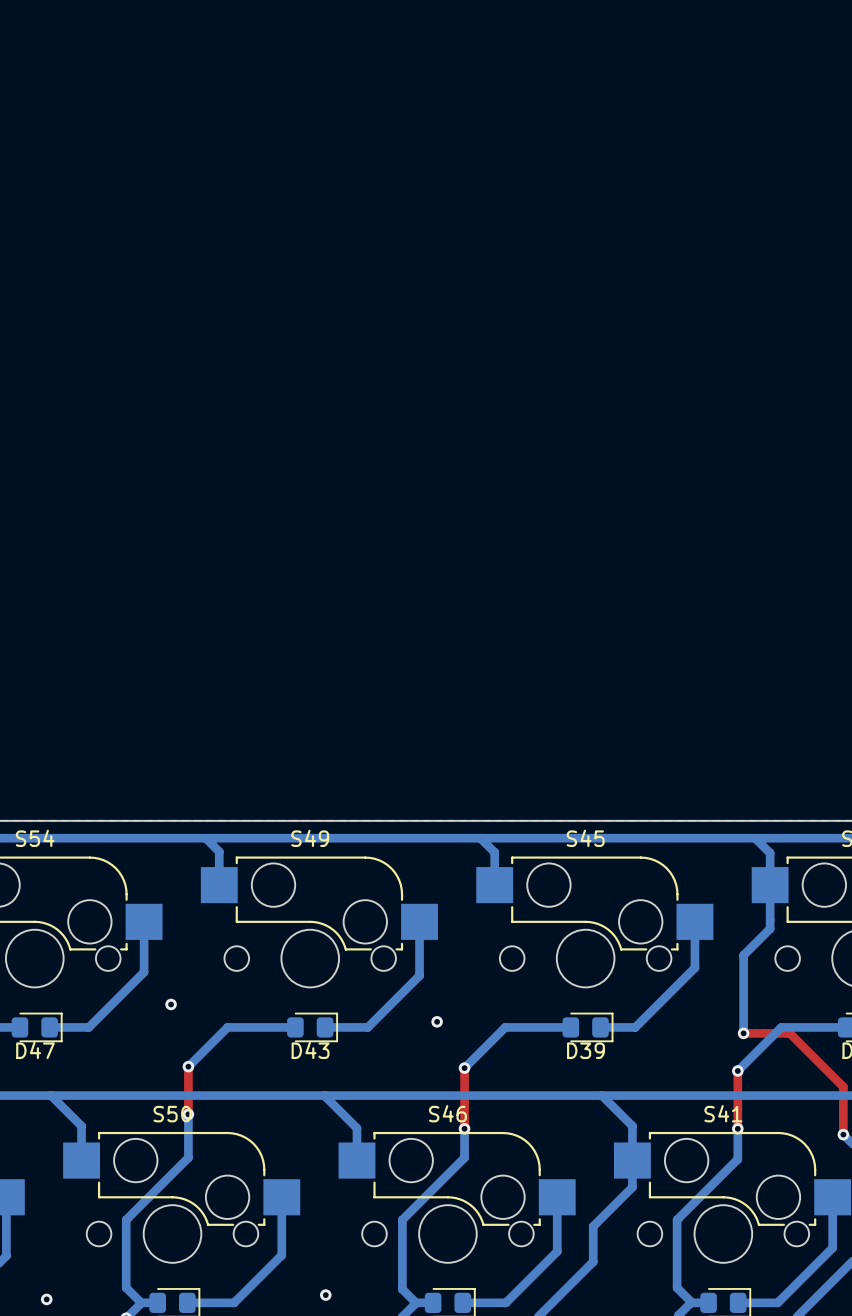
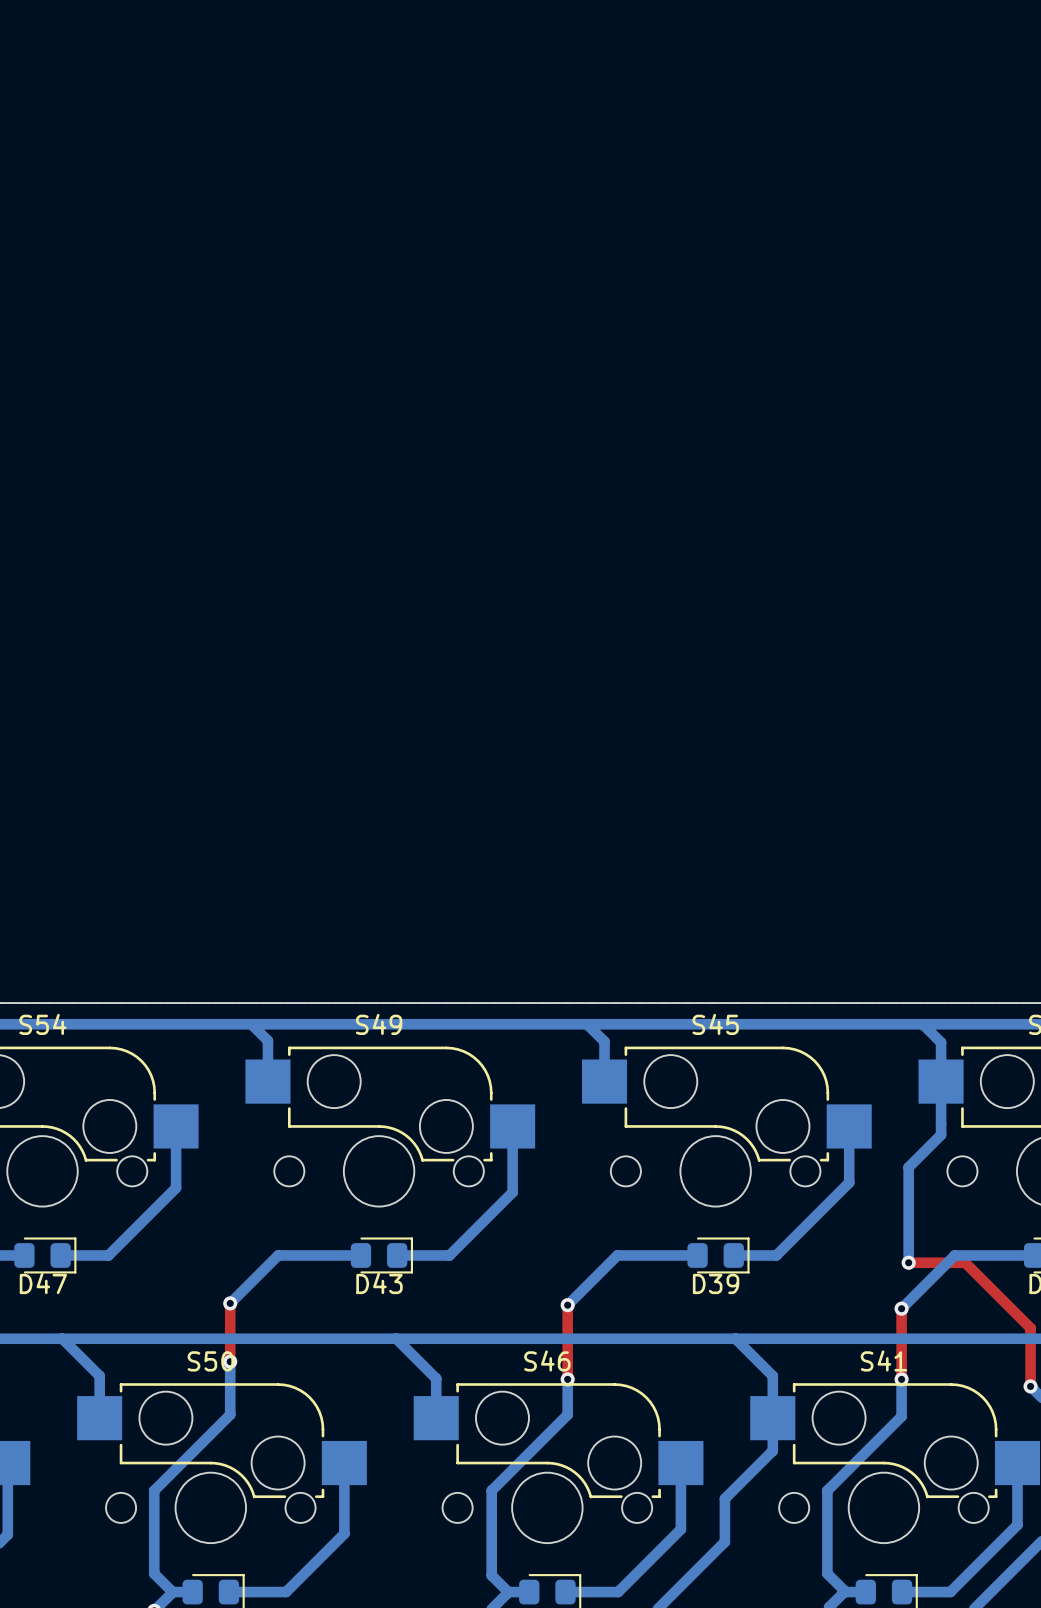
via: (171, 1004) -> none
via: (437, 1021) -> none
via: (325, 1295) -> none
via: (46, 1299) -> none

